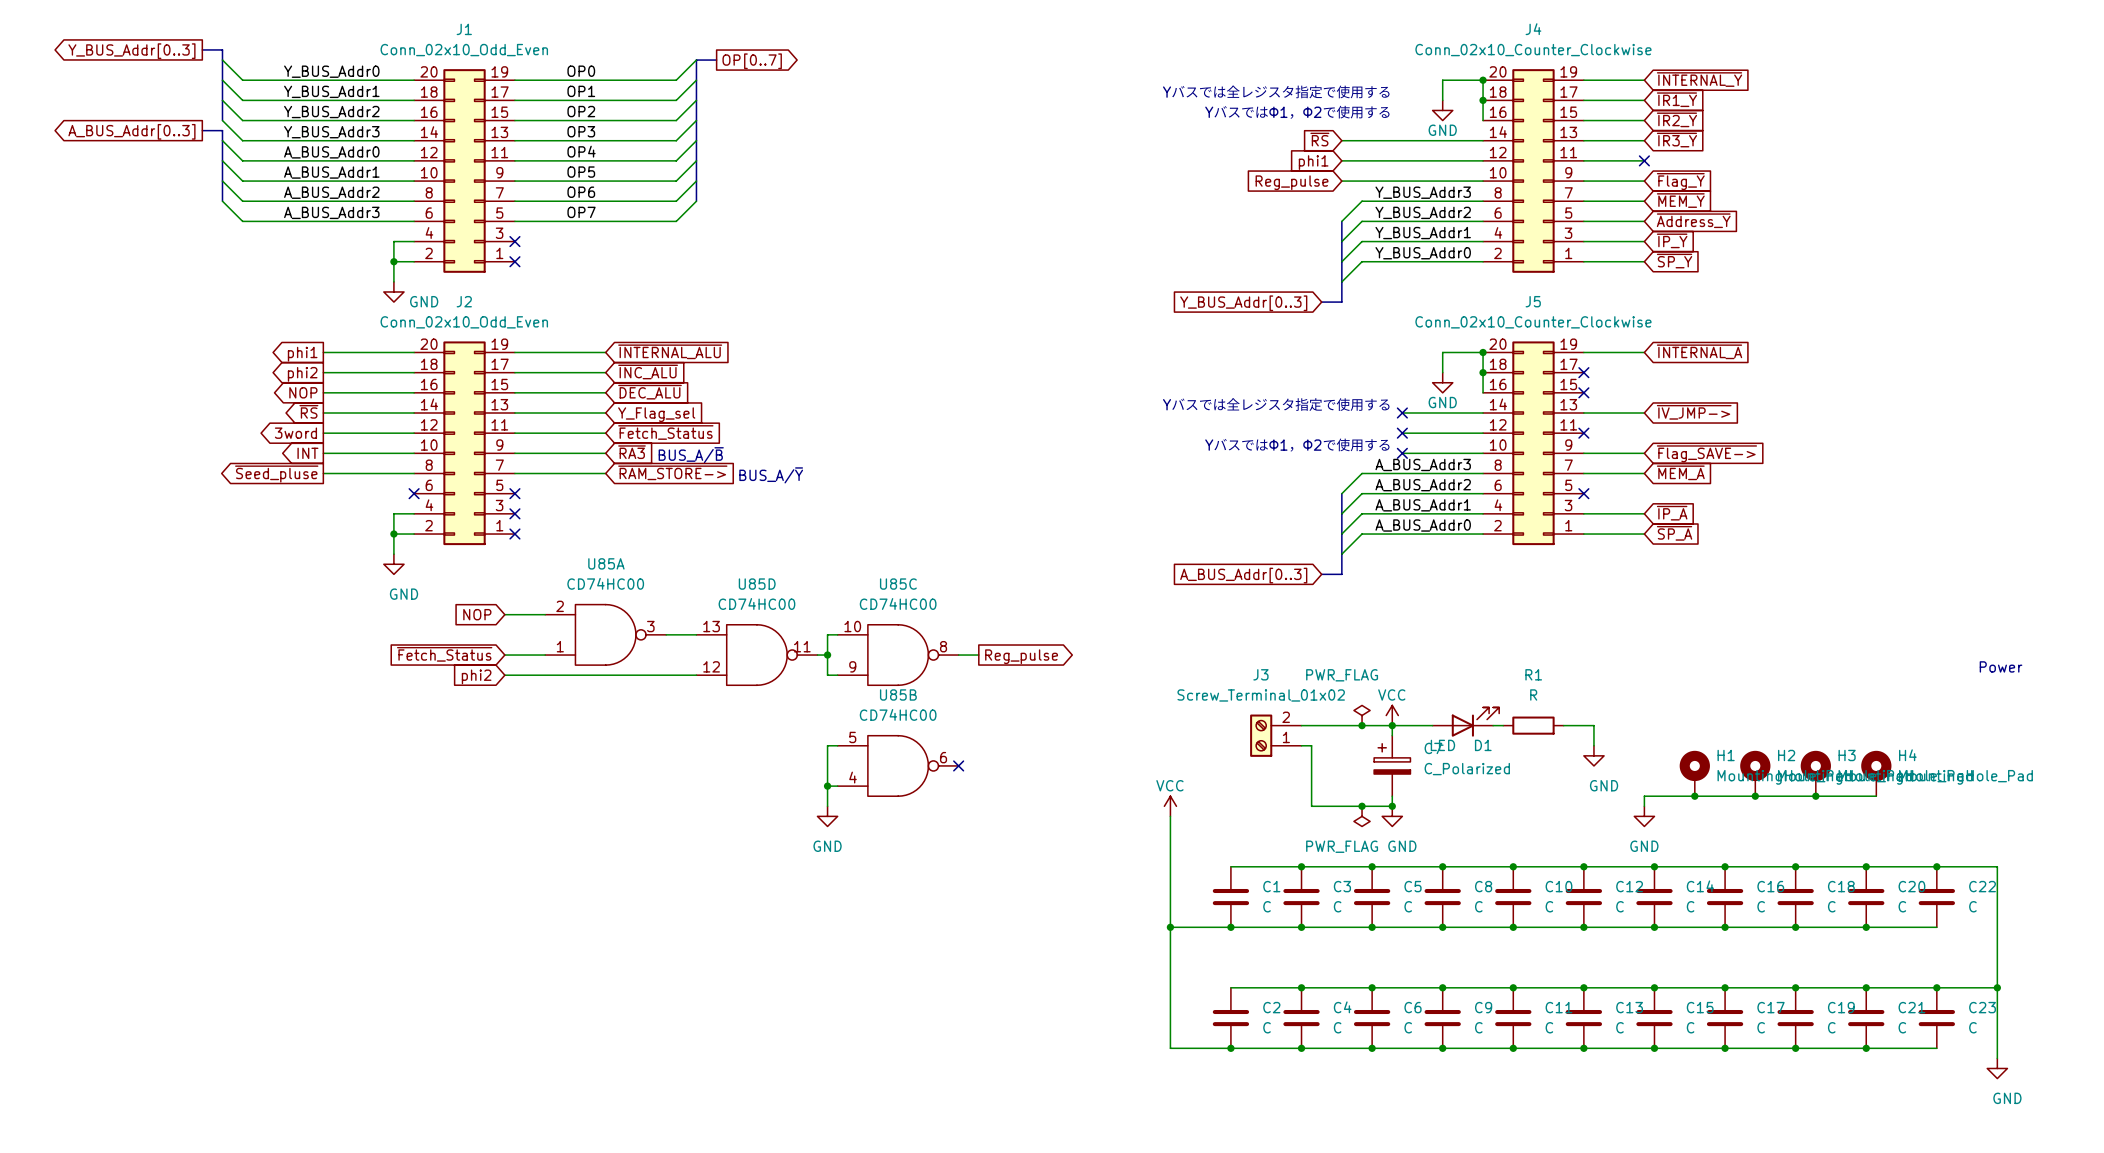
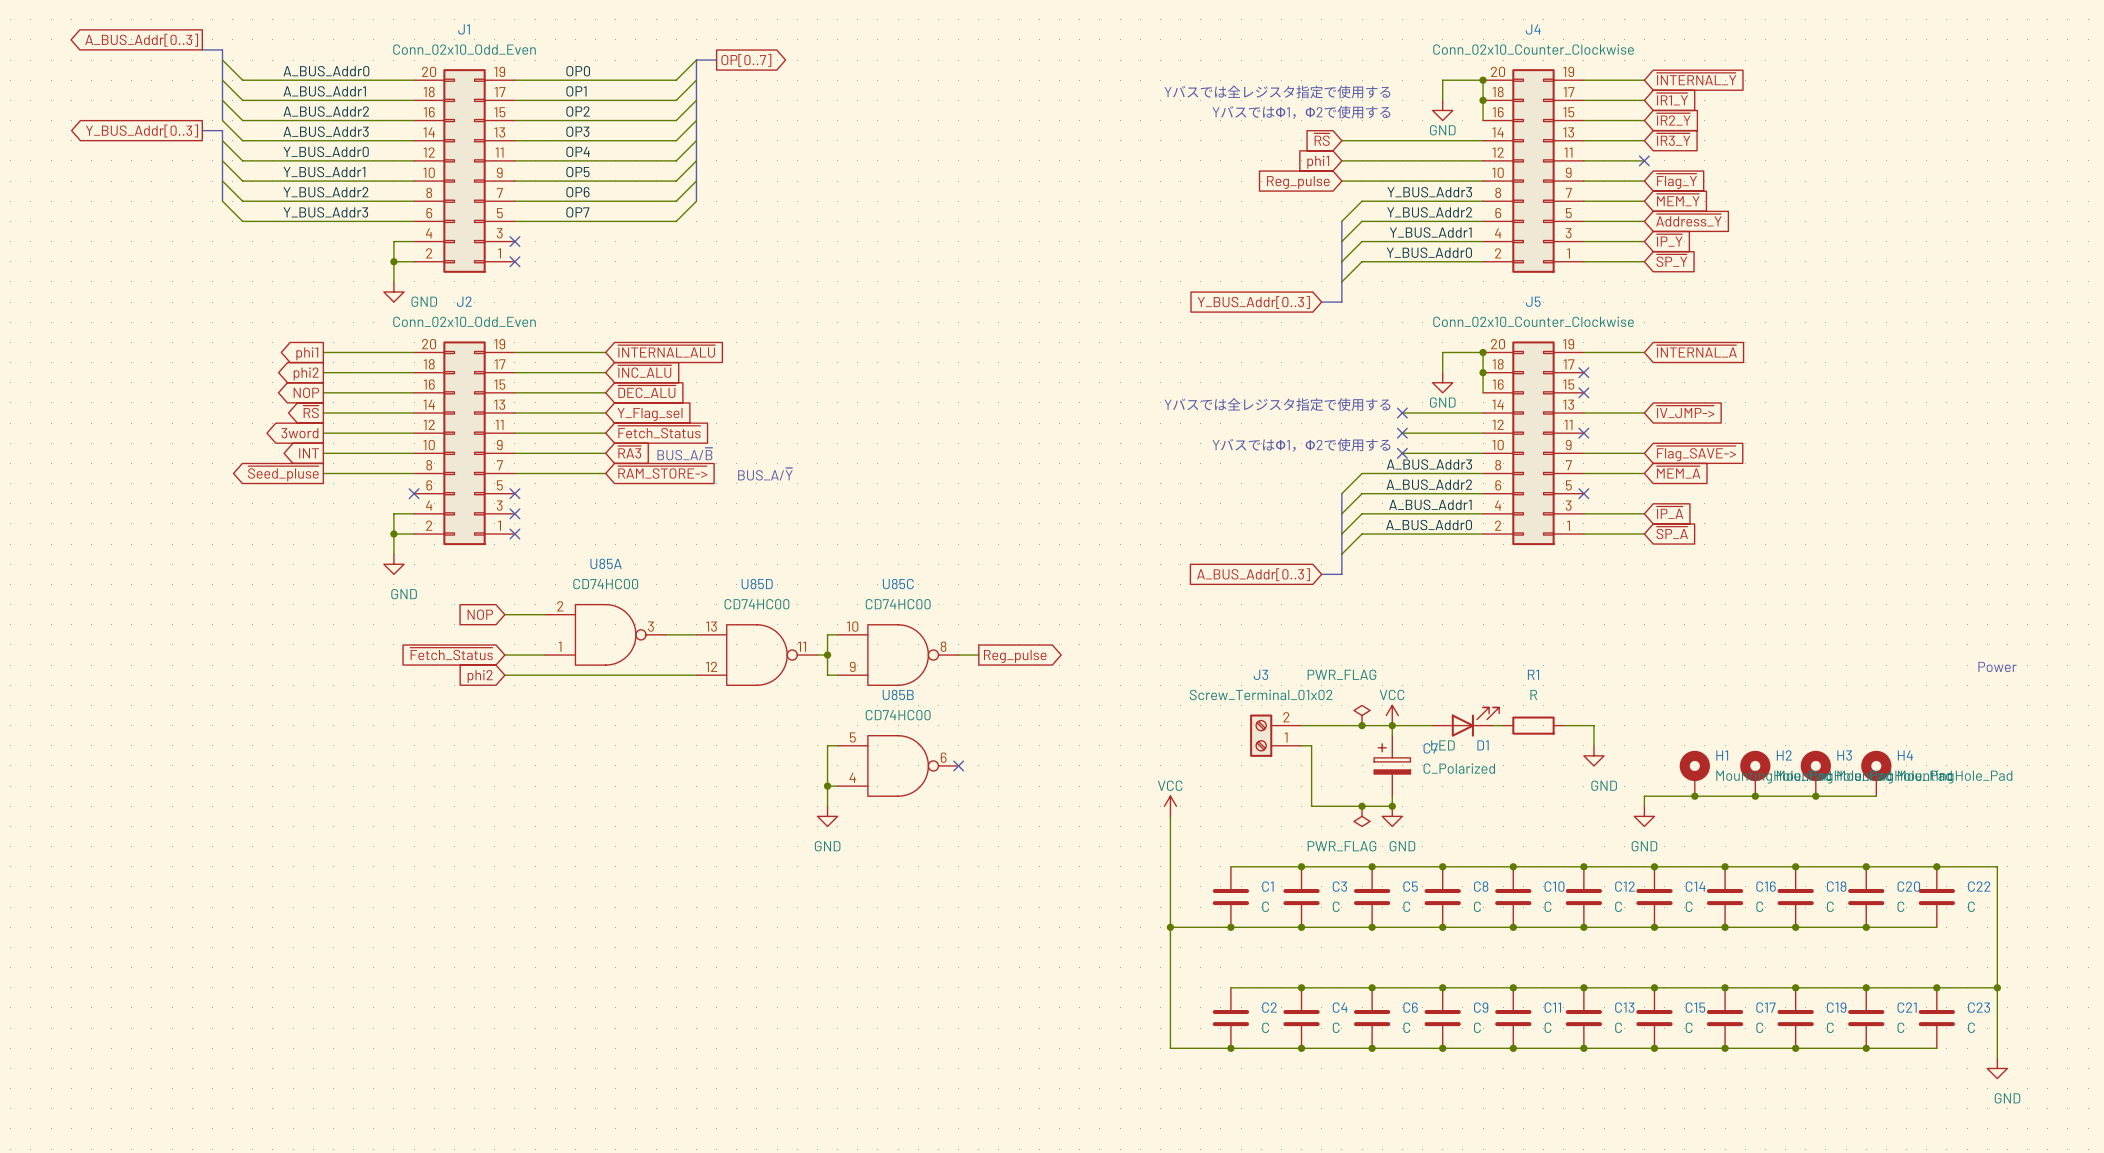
global label: Y_BUS_Addr[0..3] (131, 51) -> A_BUS_Addr[0..3] (141, 40)
label: Y_BUS_Addr0 (331, 71) -> A_BUS_Addr0 (326, 71)
label: Y_BUS_Addr1 (331, 91) -> A_BUS_Addr1 (324, 91)
label: Y_BUS_Addr2 (331, 112) -> A_BUS_Addr2 (326, 111)
global label: A_BUS_Addr[0..3] (131, 131) -> Y_BUS_Addr[0..3] (142, 130)
label: Y_BUS_Addr3 (331, 132) -> A_BUS_Addr3 (326, 131)
label: A_BUS_Addr0 (331, 152) -> Y_BUS_Addr0 (326, 151)
label: A_BUS_Addr1 (331, 172) -> Y_BUS_Addr1 (324, 172)
label: A_BUS_Addr2 (331, 192) -> Y_BUS_Addr2 (326, 192)
label: A_BUS_Addr3 (331, 212) -> Y_BUS_Addr3 (325, 212)

